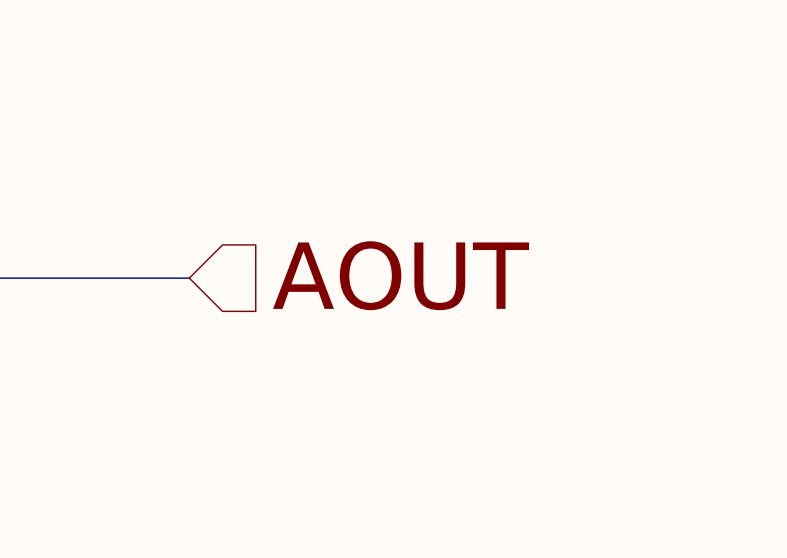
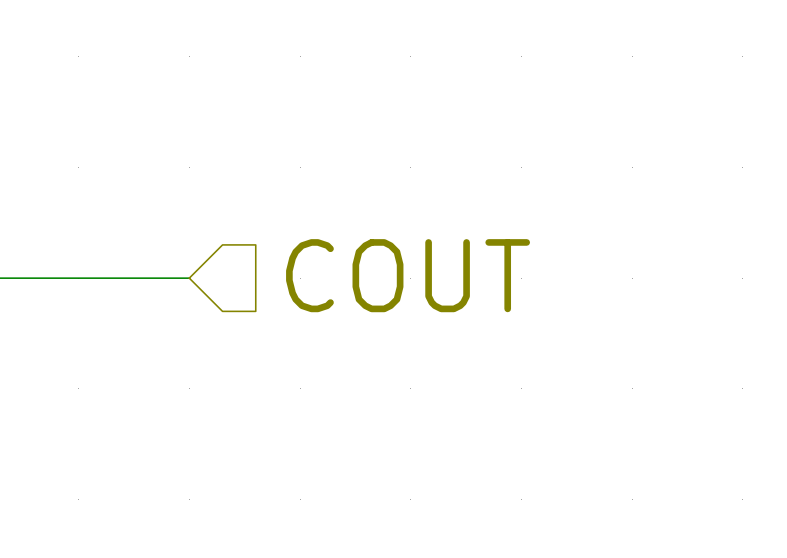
hierarchical label: AOUT (401, 275) -> COUT (408, 275)

